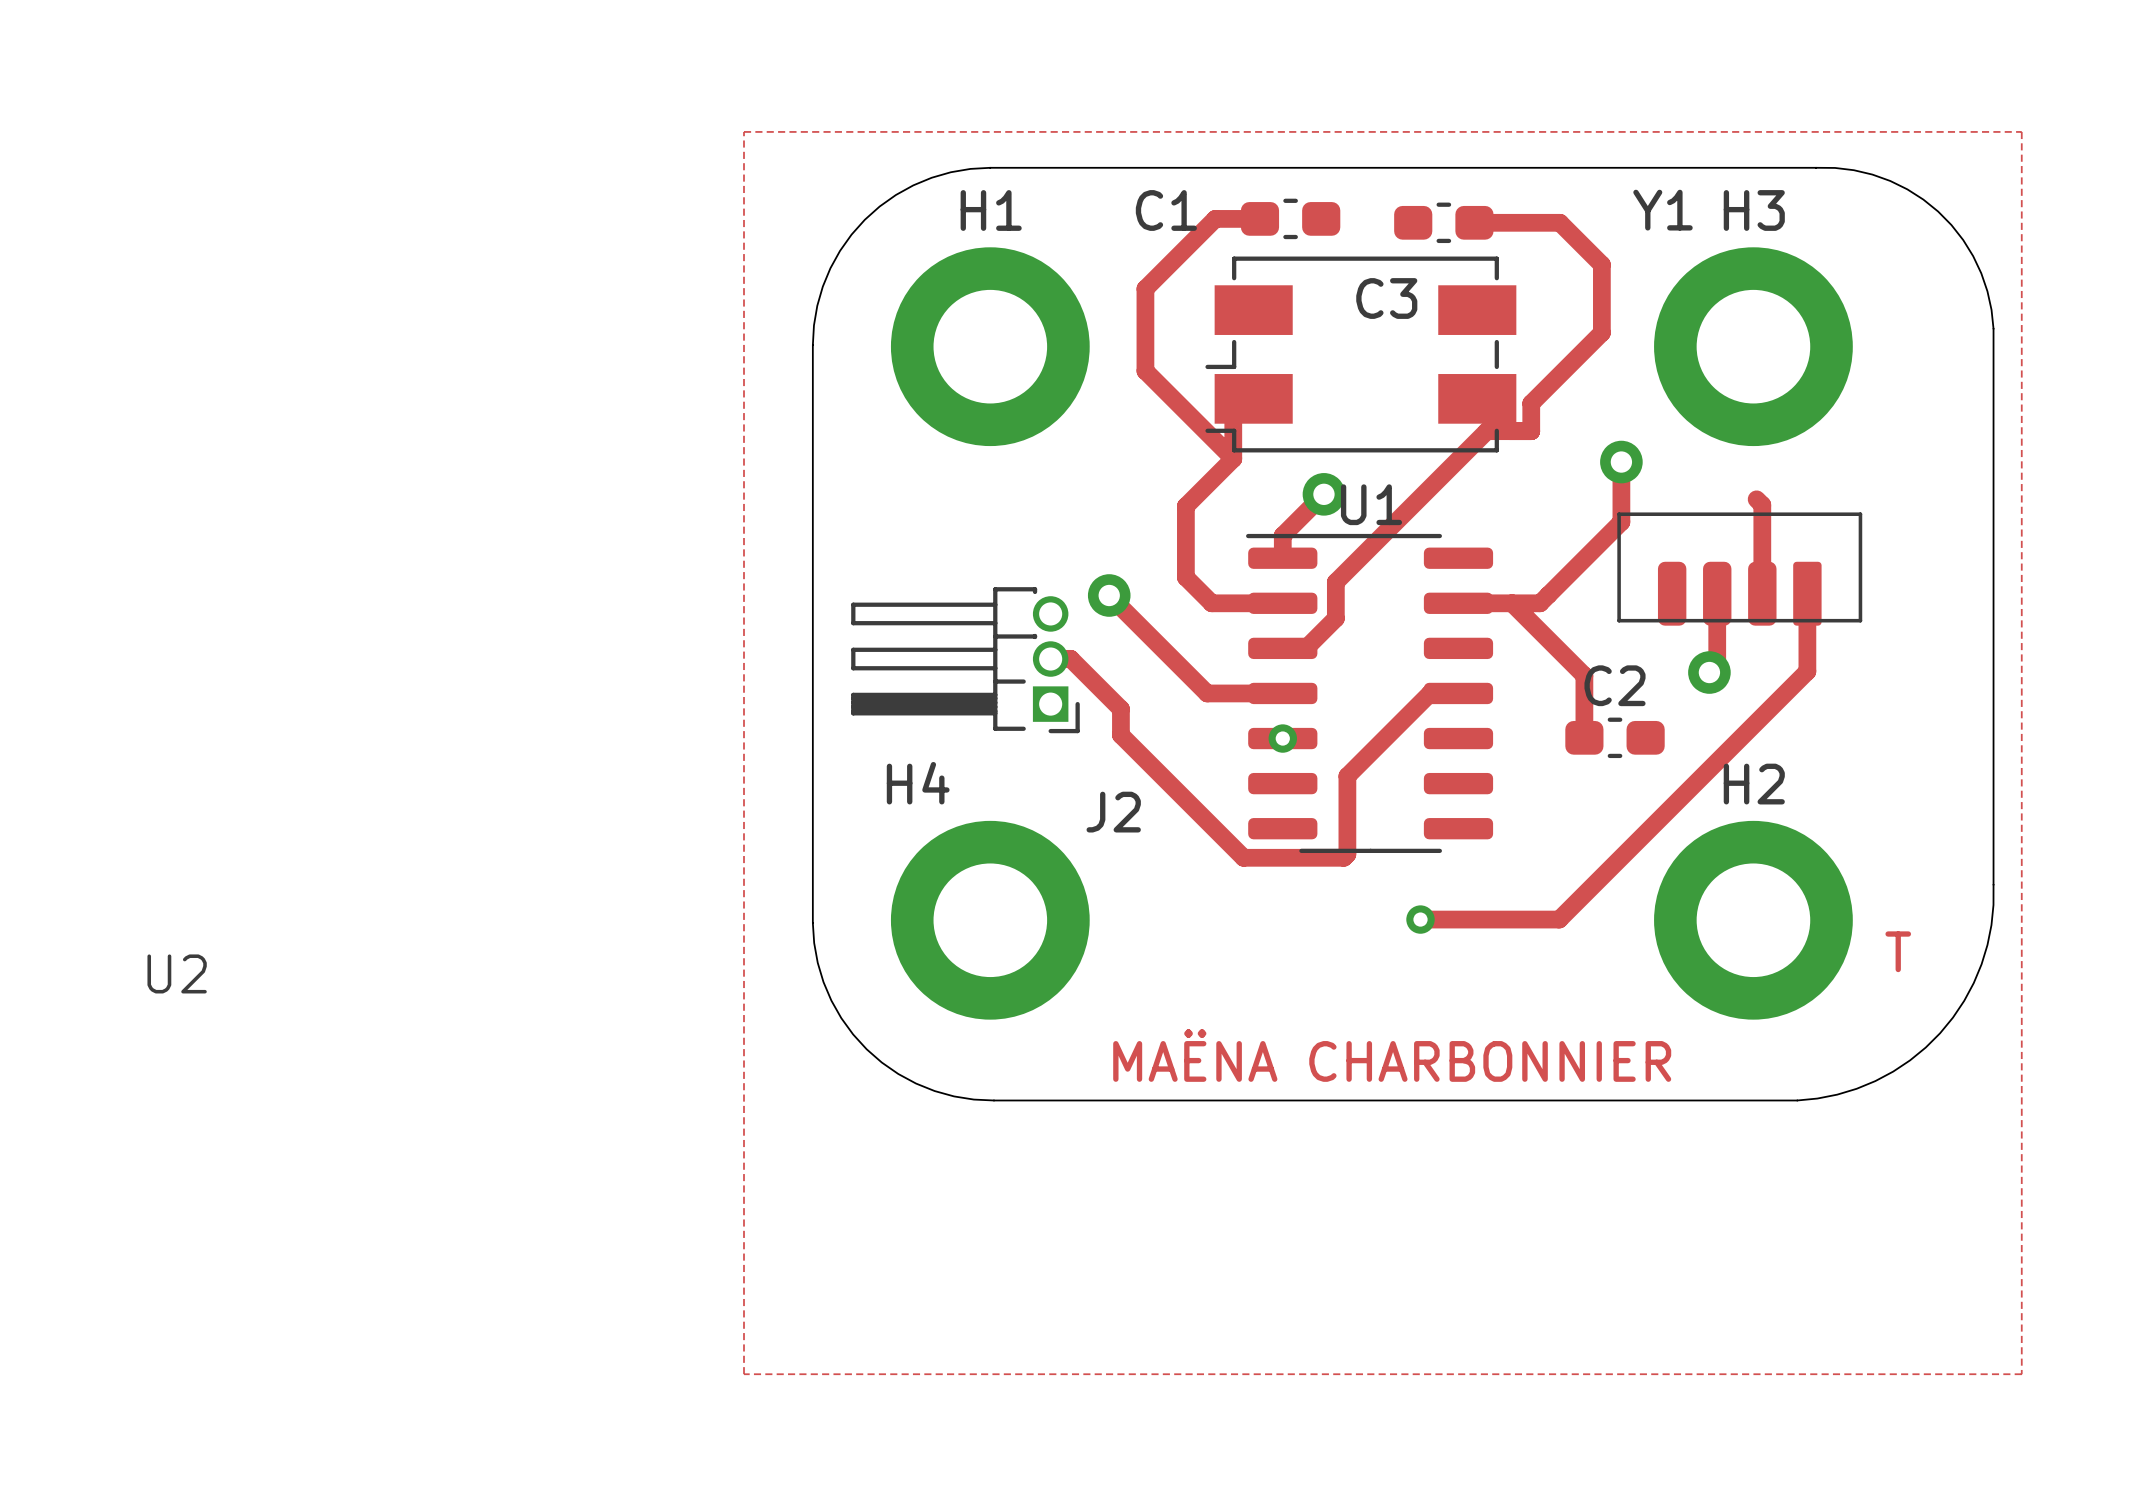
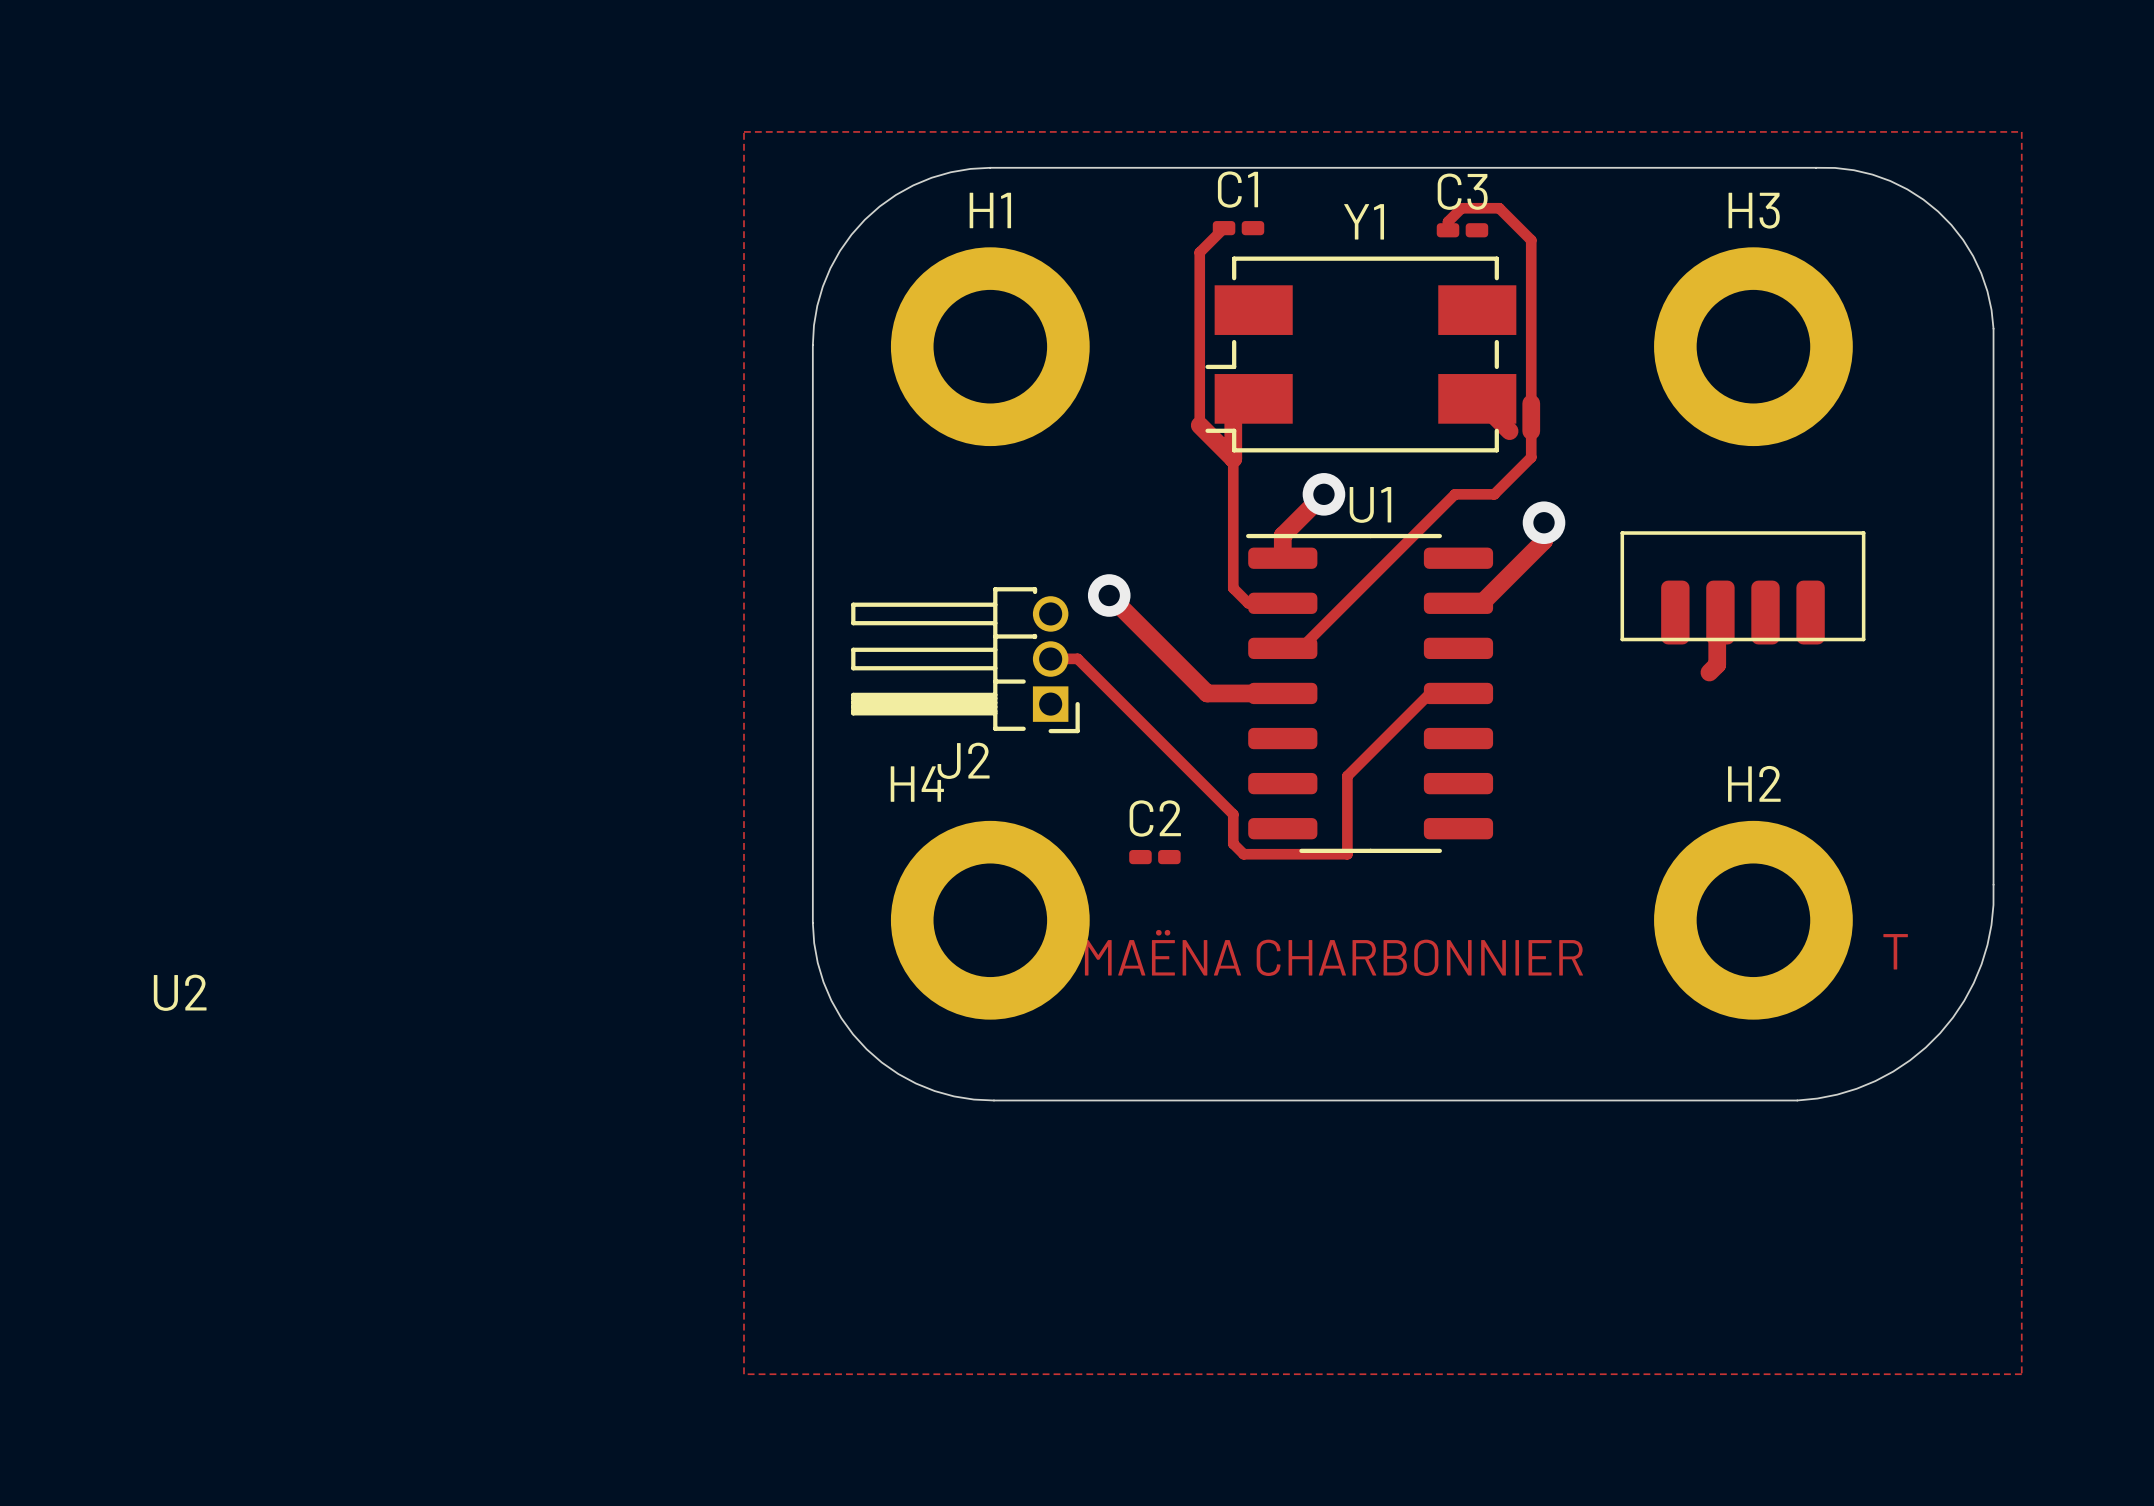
C1 footprint: [1240, 198, 1341, 240] -> [1212, 221, 1265, 236]
C3 footprint: [1394, 202, 1494, 244] -> [1436, 223, 1489, 238]
C1 name position: C1 (1166, 210) -> C1 (1237, 189)
Y1 name position: Y1 (1663, 210) -> Y1 (1364, 221)
track: (1259, 218) (1215, 218) (1145, 288) (1145, 371) (1199, 425) -> (1224, 228) (1199, 252) (1199, 425)
track: (1474, 222) (1559, 222) (1601, 264) (1601, 332) (1531, 403) -> (1448, 230) (1448, 221) (1461, 208) (1499, 208) (1531, 240) (1531, 403)
C3 name position: C3 (1386, 298) -> C3 (1462, 191)
track: (1531, 431) (1486, 431) (1335, 582) (1335, 618) (1305, 648) (1300, 648) -> (1531, 431) (1531, 457) (1494, 494) (1454, 494) (1300, 648)
track: (1233, 458) (1185, 506) (1185, 577) (1211, 603) (1248, 603) -> (1233, 458) (1233, 588) (1248, 603)
track: (1621, 462) (1621, 522) (1540, 603) (1481, 603) -> (1544, 522) (1544, 540) (1481, 603)
via position: (1621, 462) -> (1544, 522)
track: (1756, 499) (1762, 504) (1762, 593) -> none
U2 footprint: [1617, 512, 1863, 626] -> [1620, 531, 1866, 645]
track: (1807, 593) (1807, 671) (1559, 919) (1420, 919) -> none
track: (1512, 603) (1584, 675) (1584, 737) -> none
track: (1070, 658) (1120, 709) (1120, 735) (1243, 857) (1343, 857) (1347, 854) -> (1070, 658) (1077, 658) (1233, 814) (1233, 843) (1243, 854) (1347, 854)
via: (1709, 672) -> none
track width: thick (1458, 693) (1430, 693) (1347, 776) (1347, 854) -> thin (1458, 693) (1430, 693) (1347, 776) (1347, 854)
C2 footprint: [1565, 717, 1665, 759] -> [1129, 849, 1181, 865]
via: (1282, 738) -> none
J2 name position: J2 (1113, 812) -> J2 (963, 760)
via: (1420, 919) -> none
U2 name position: U2 (177, 973) -> U2 (180, 992)
text position: MAËNA CHARBONNIER (1392, 1055) -> MAËNA CHARBONNIER (1333, 952)

